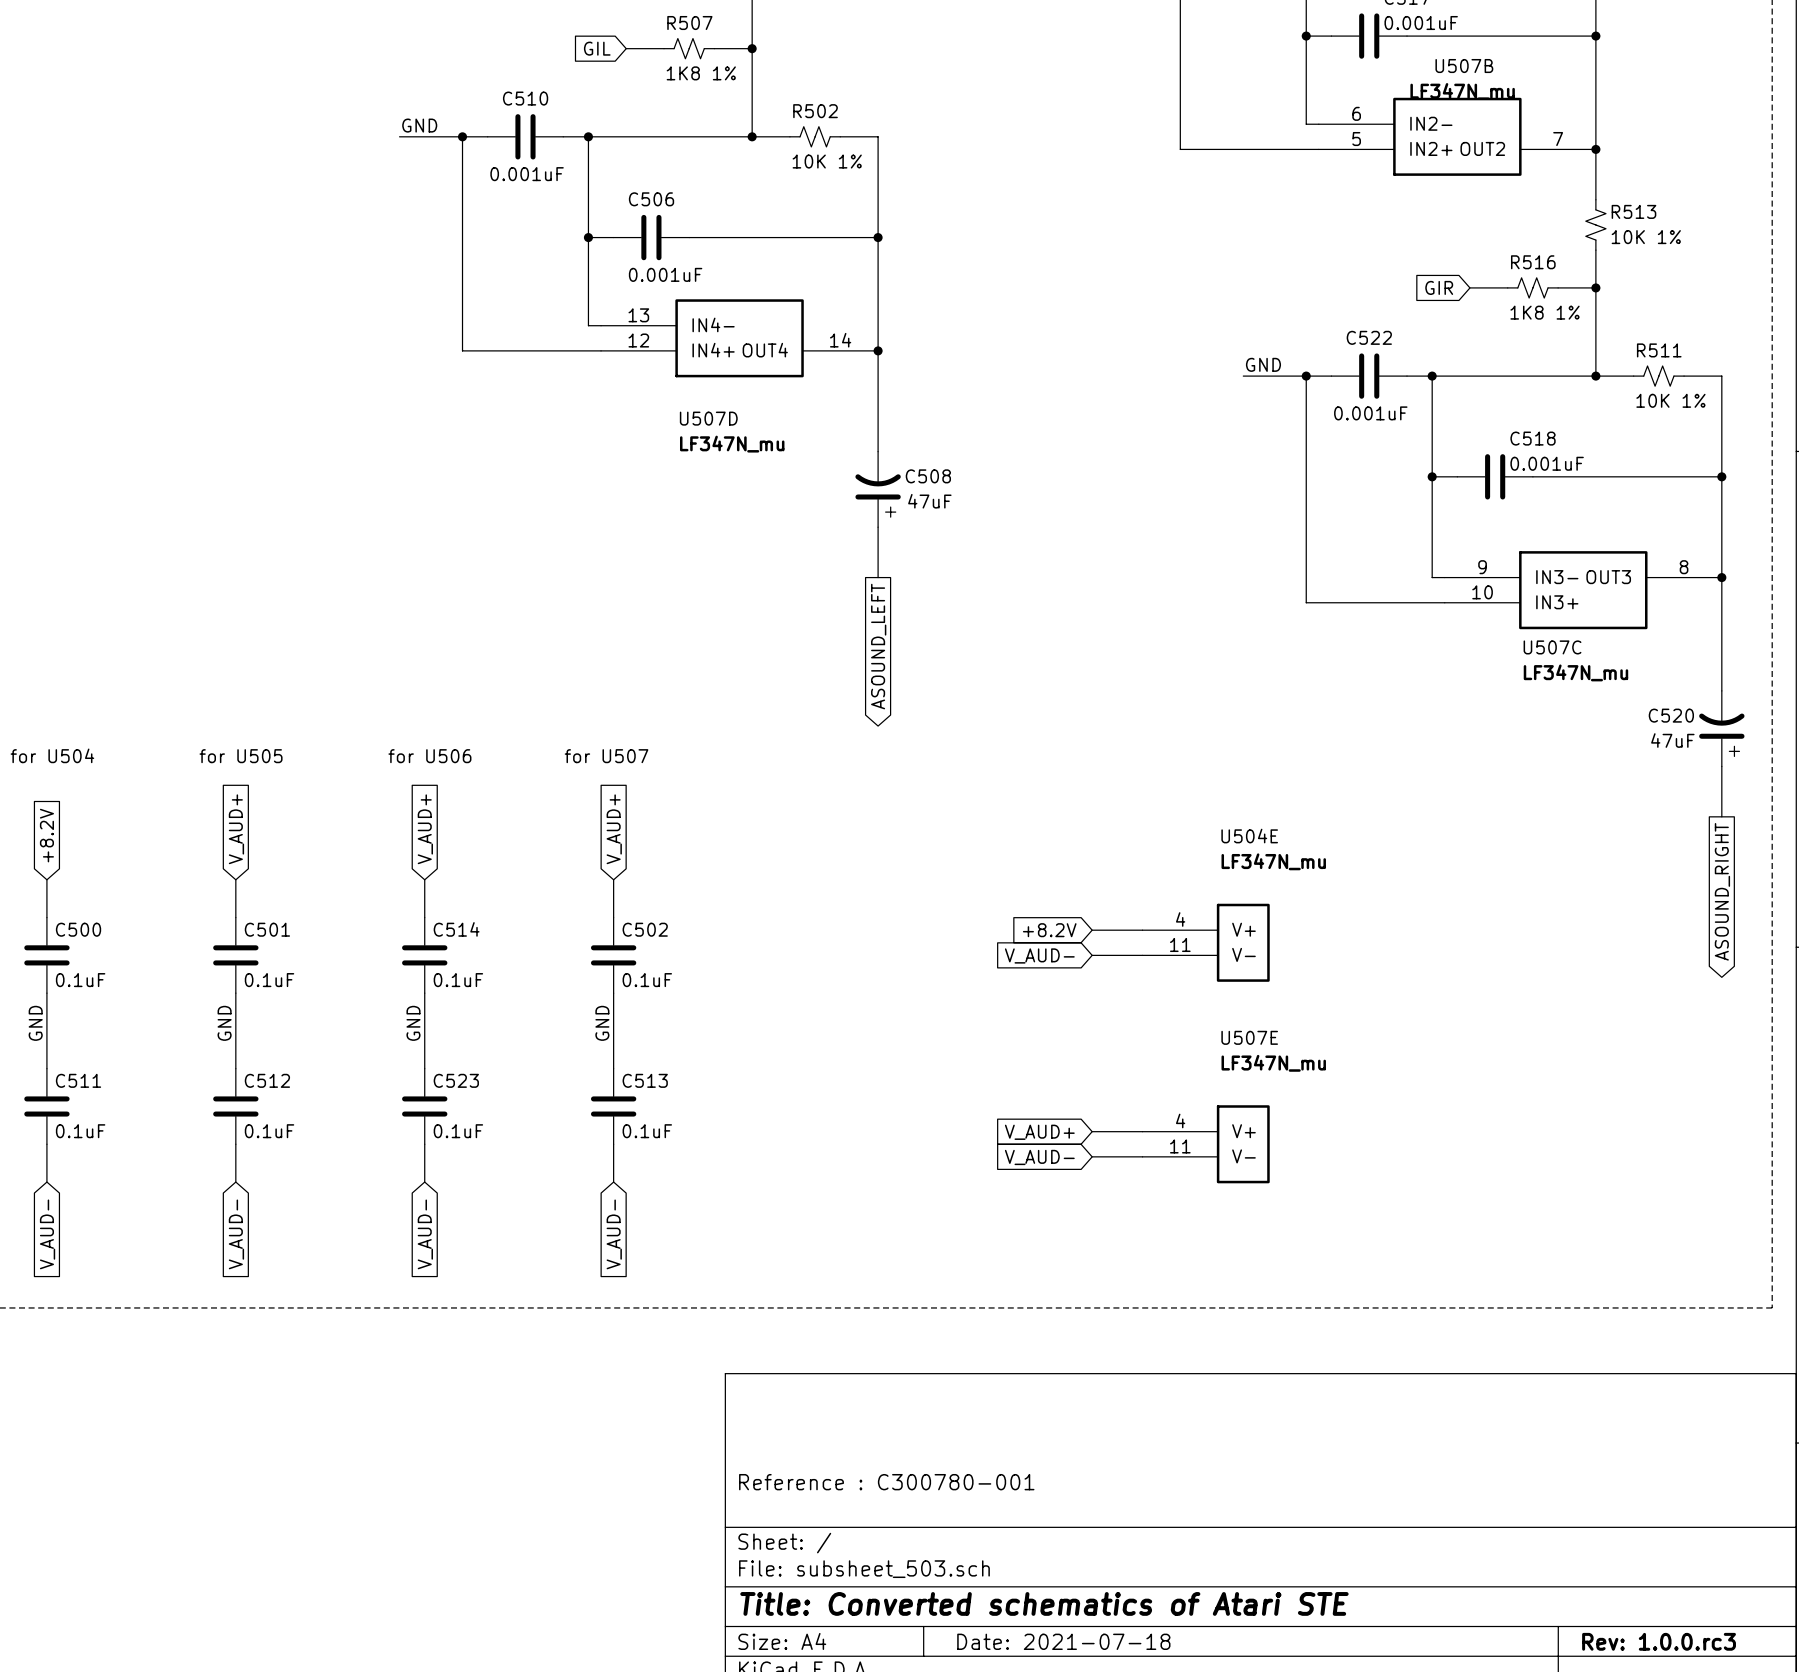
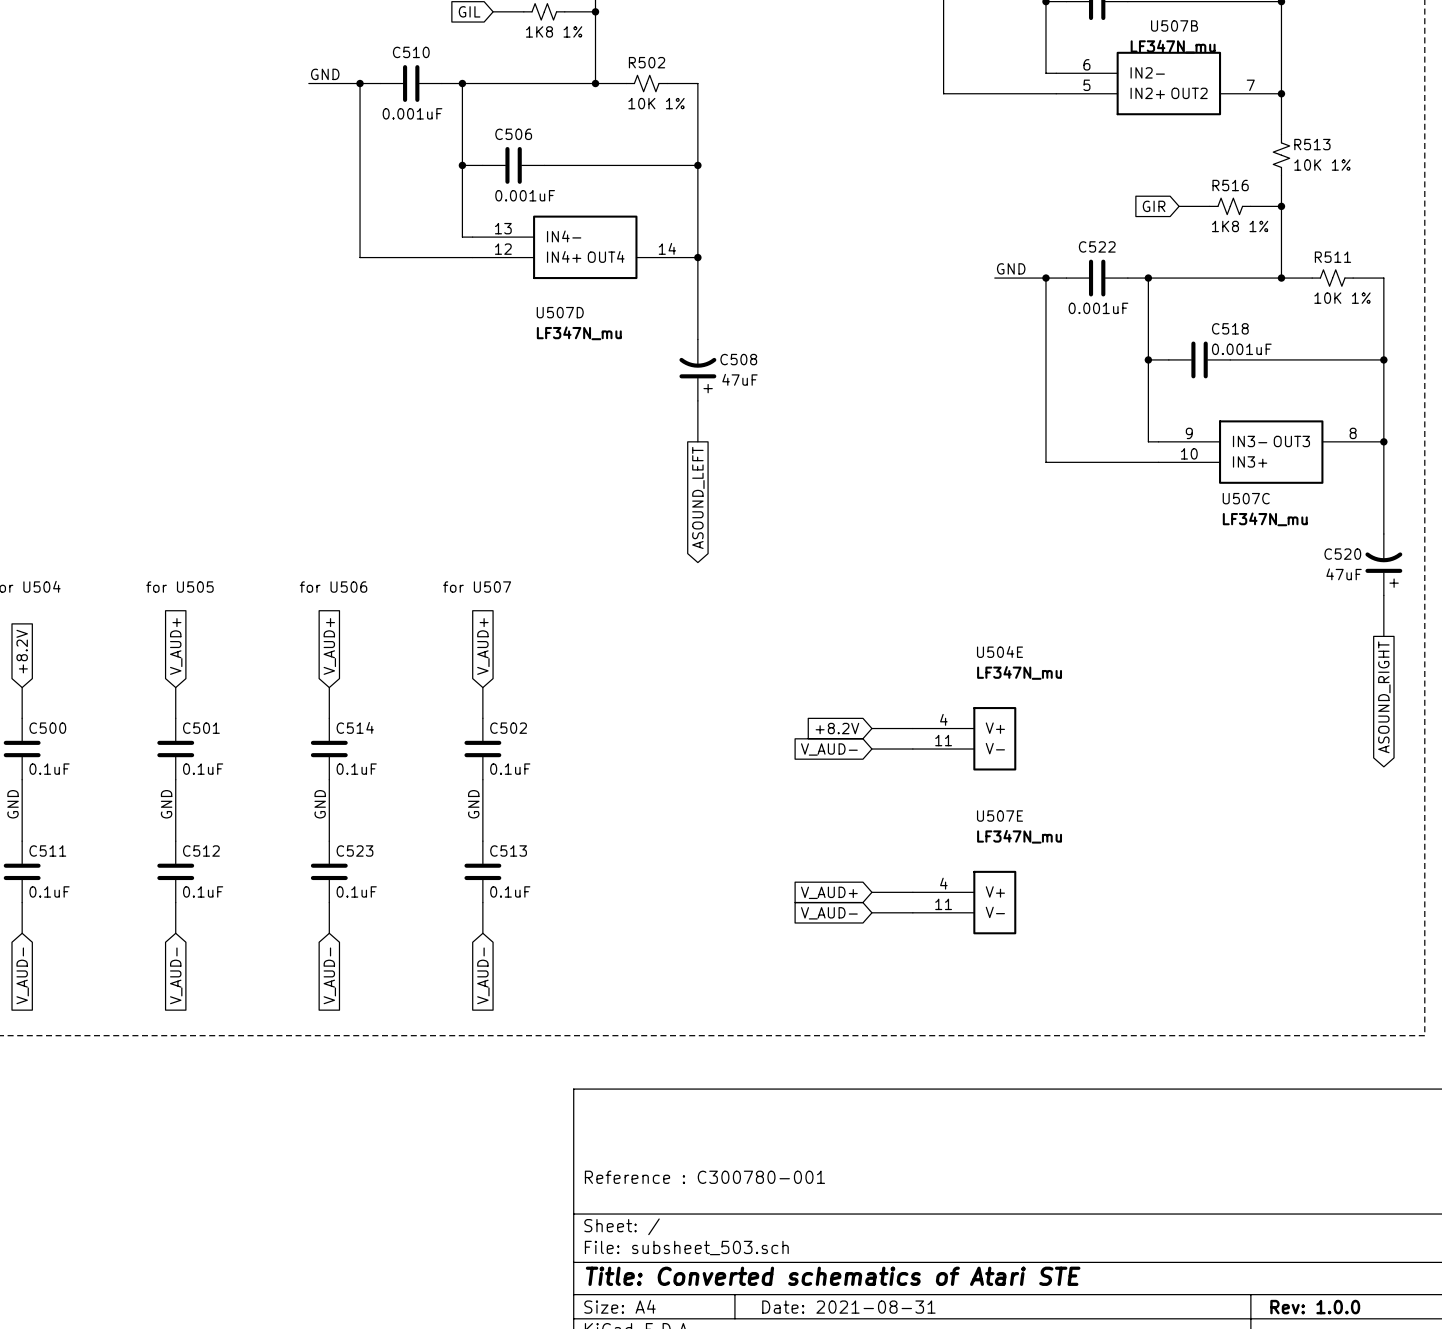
title block: Date: 2021-07-18 (1063, 1641) -> Date: 2021-08-31 (848, 1307)
title block: Rev: 1.0.0.rc3 (1659, 1641) -> Rev: 1.0.0 (1315, 1307)

